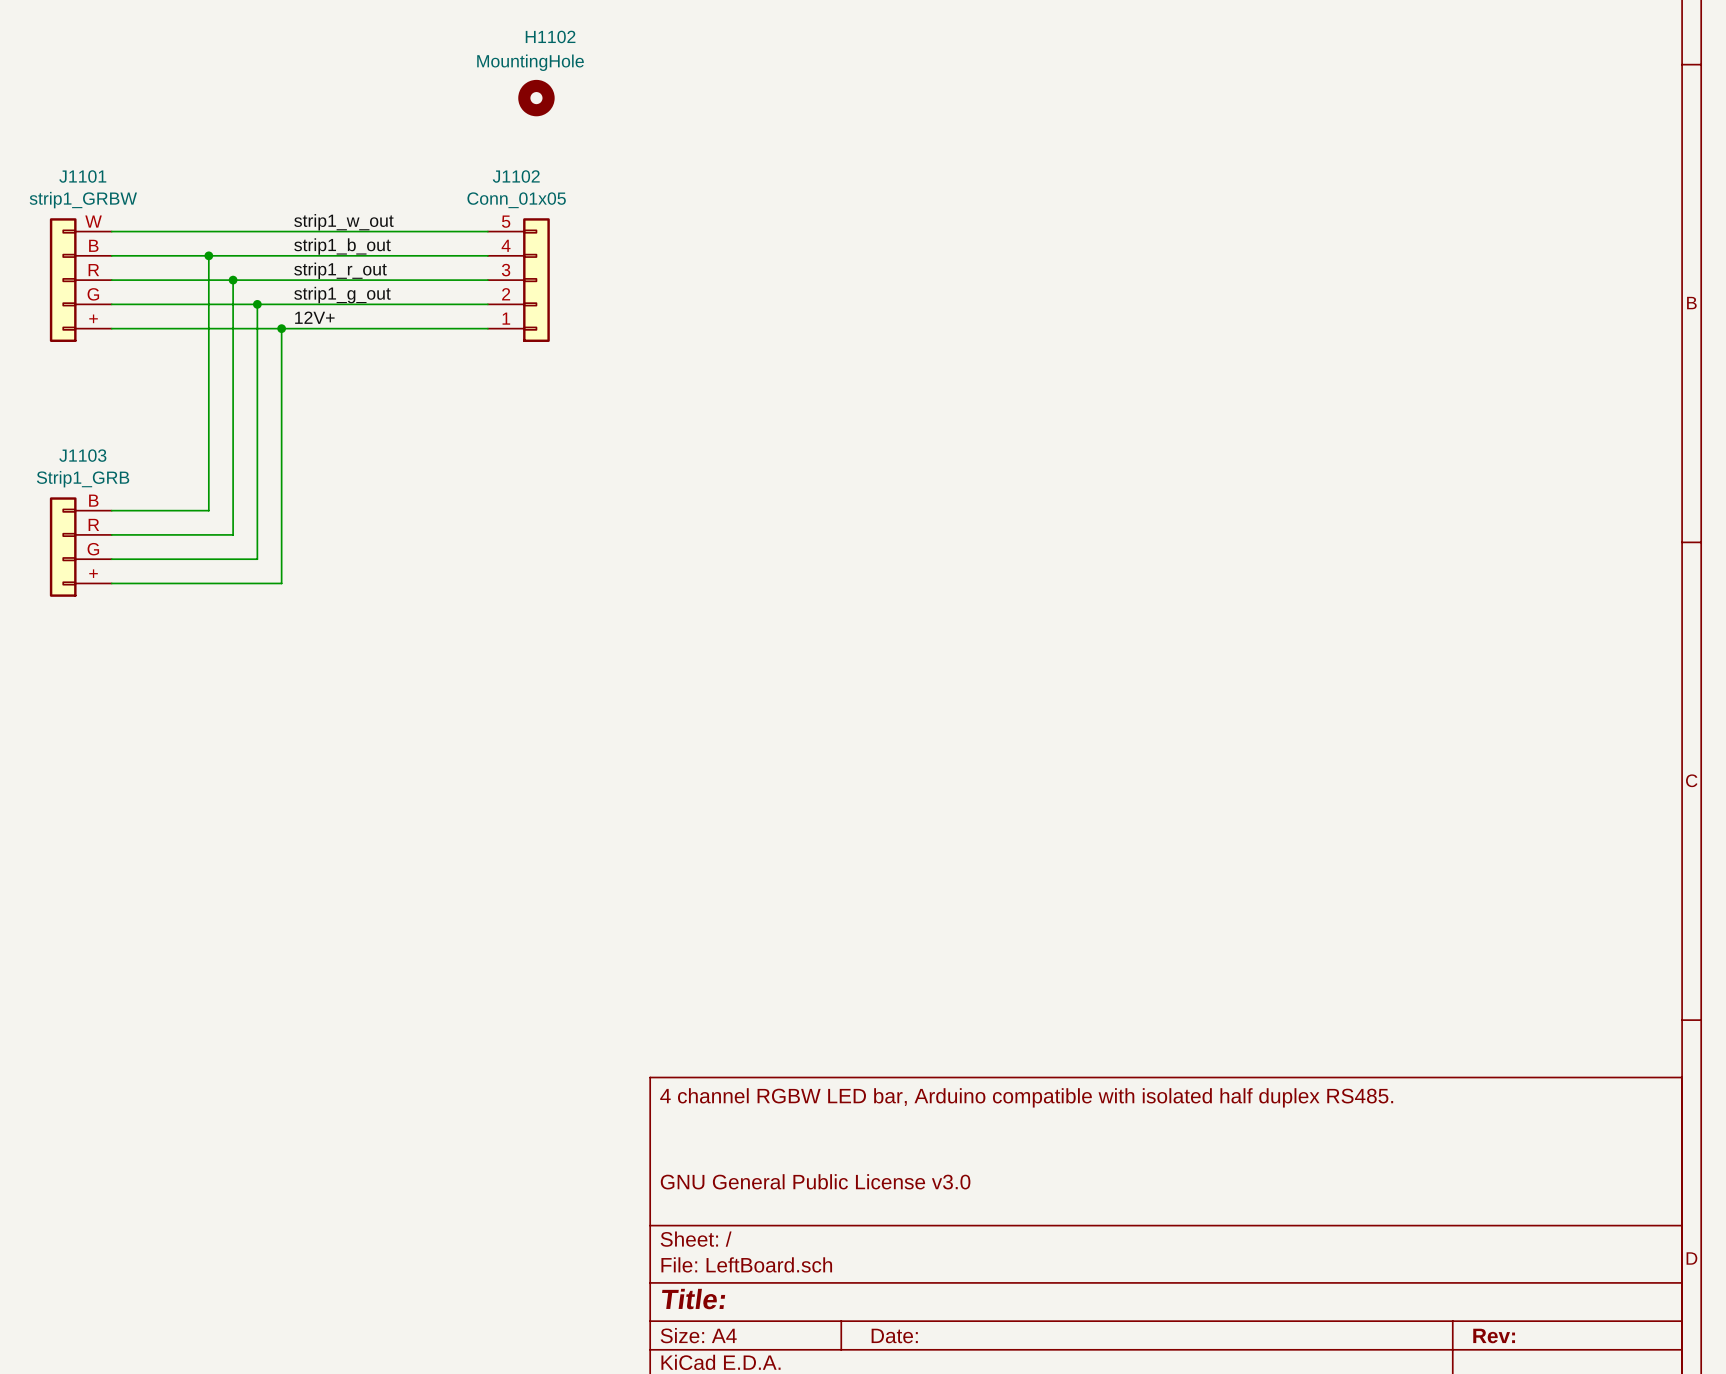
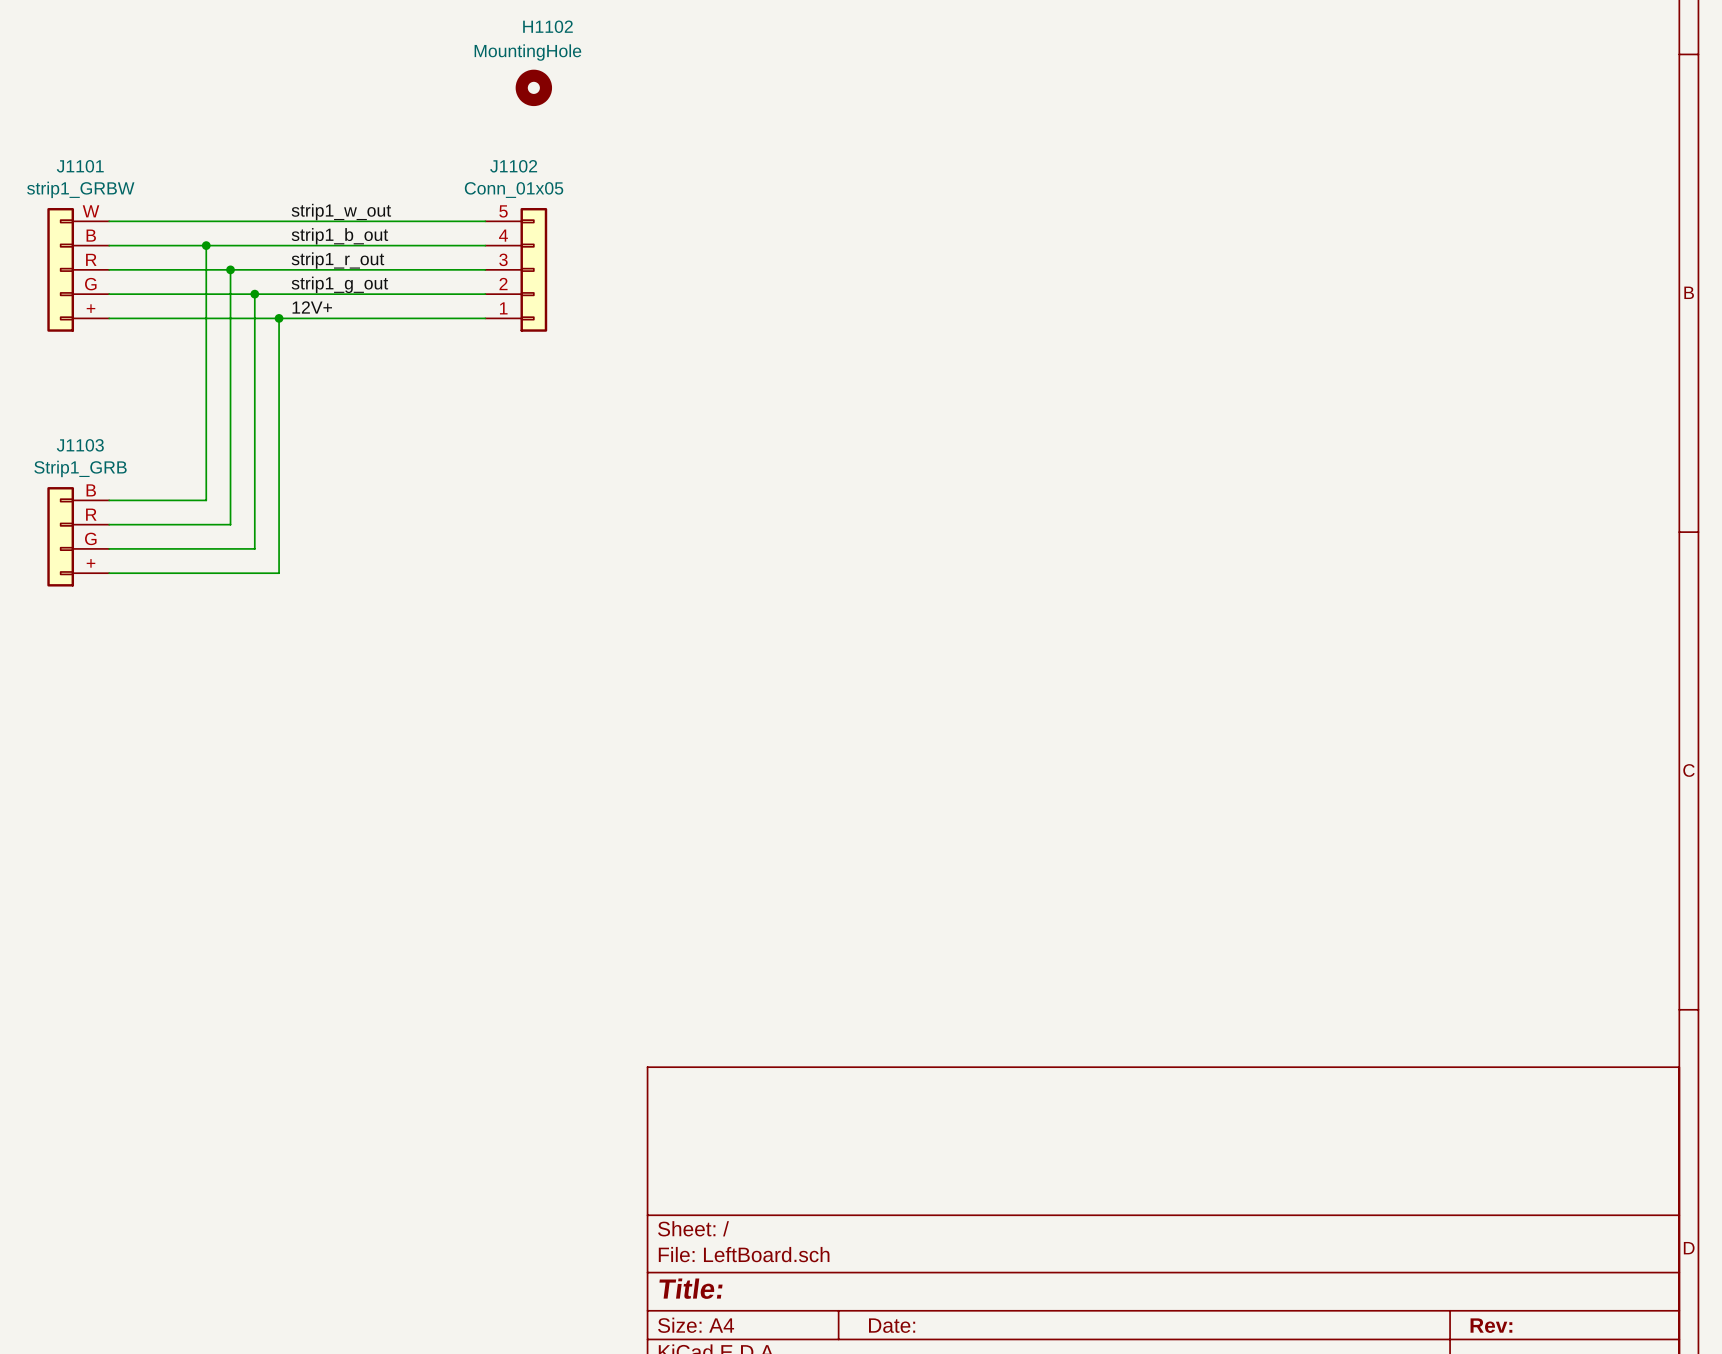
title block: 4 channel RGBW LED bar, Arduino compatible with isolated half duplex RS485. (1026, 1097) -> none
title block: GNU General Public License v3.0 (815, 1181) -> none

